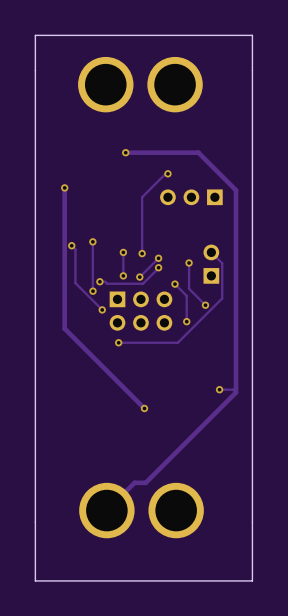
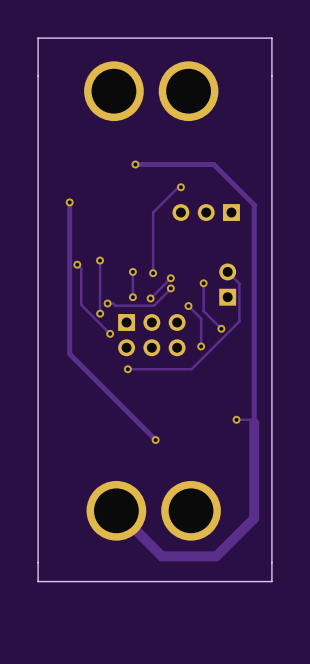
track: (236, 392) (145, 482) (134, 482) (106, 510) -> (254, 422) (254, 518) (216, 556) (161, 556) (116, 510)
part position: (141, 510) -> (153, 510)
board edge: (252, 539) (252, 580) (35, 580) (35, 539) -> (271, 581) (38, 581)

